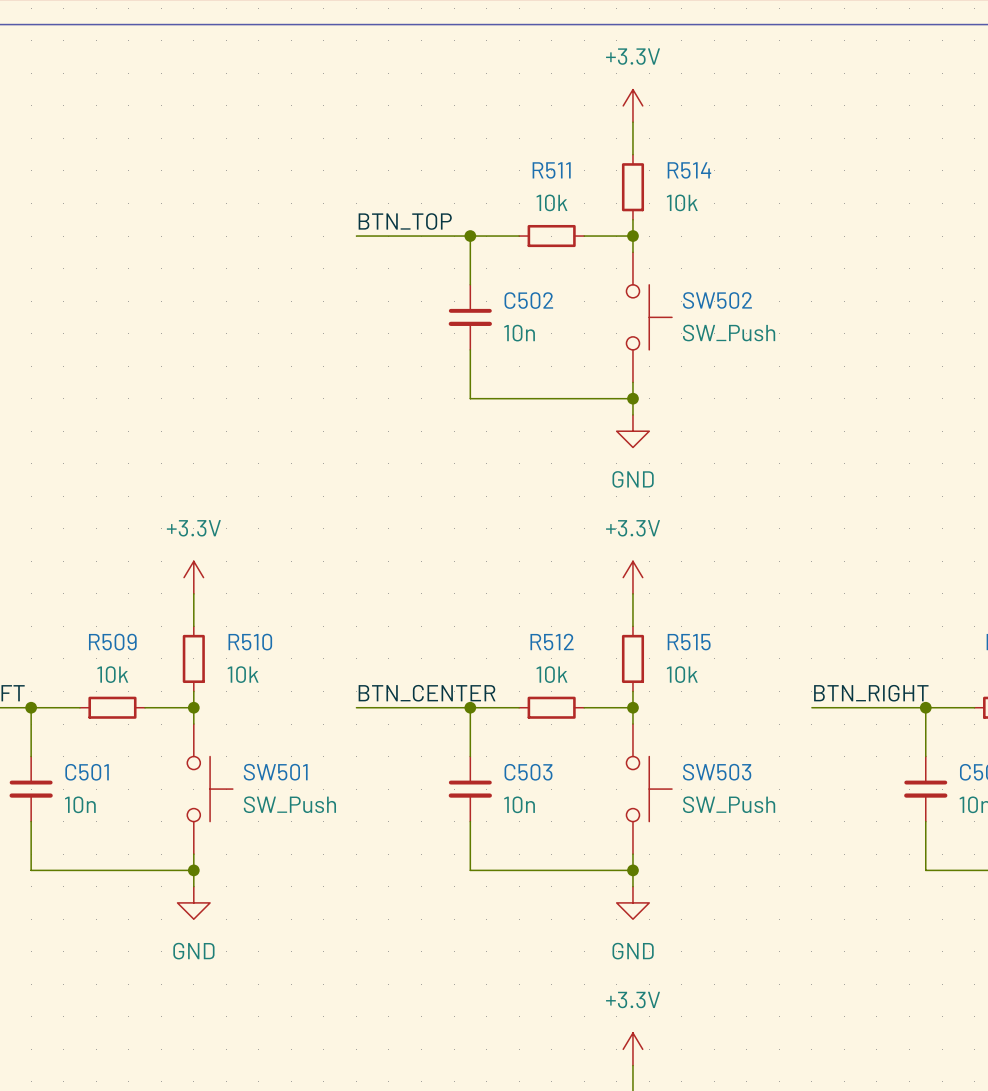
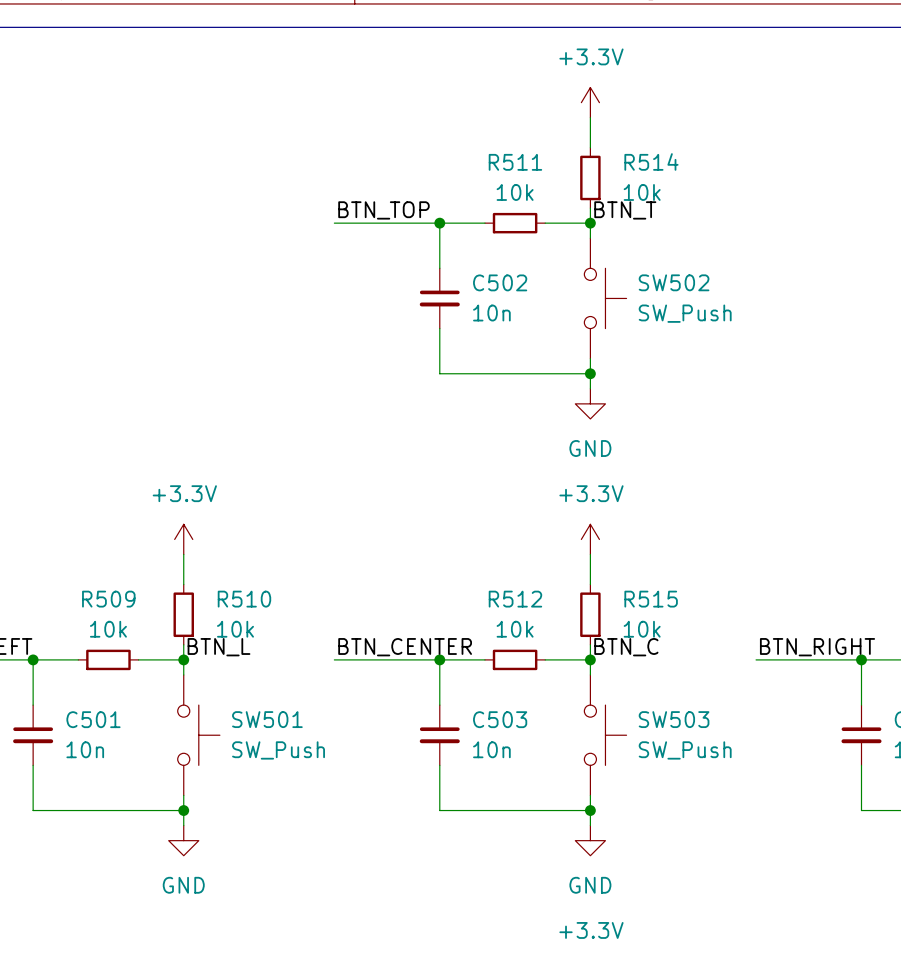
label: none -> BTN_T (625, 210)
label: none -> BTN_L (219, 647)
label: none -> BTN_C (626, 647)

